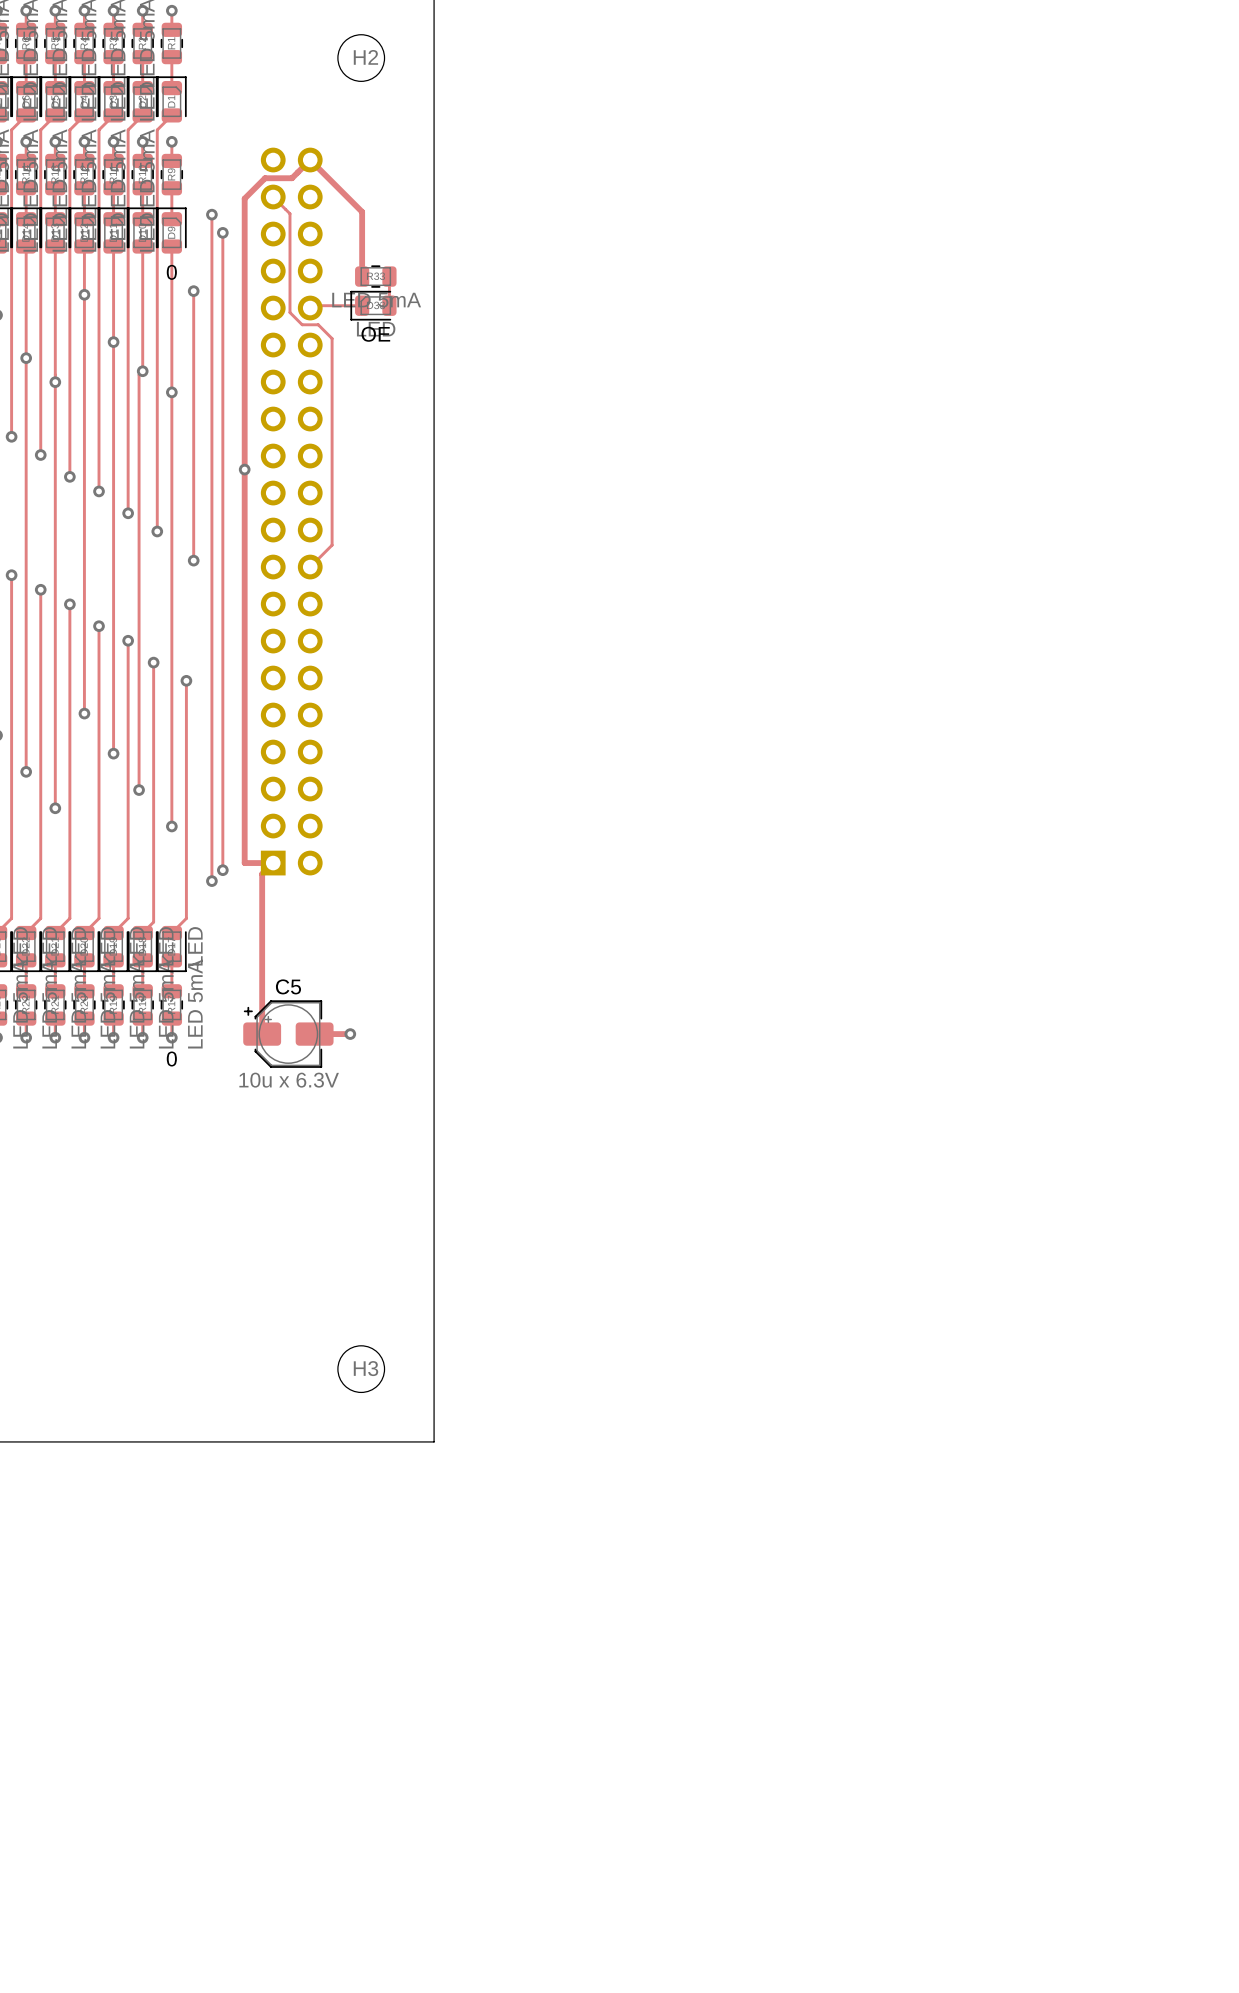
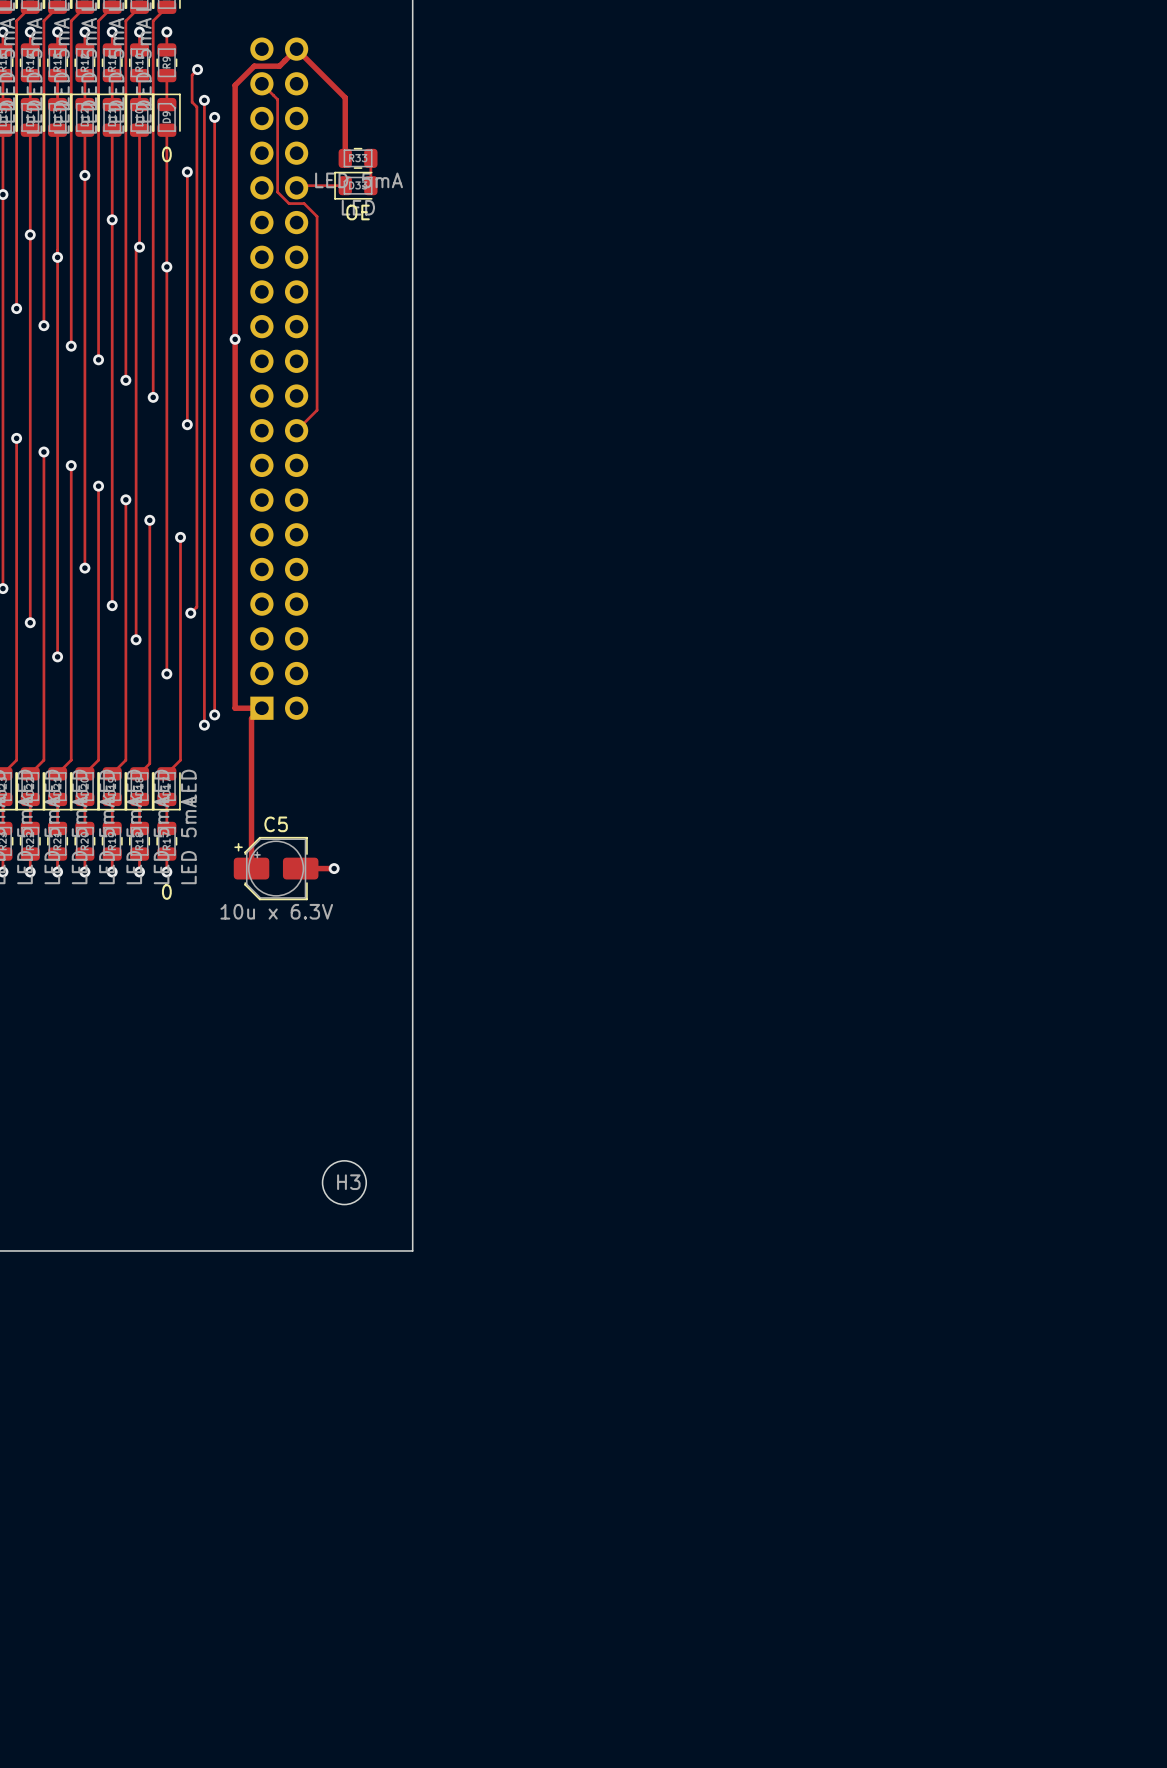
track: none -> (197, 69) (192, 75) (192, 102) (196, 106) (196, 607) (190, 613)
via: none -> (197, 69)
via: none -> (190, 613)

